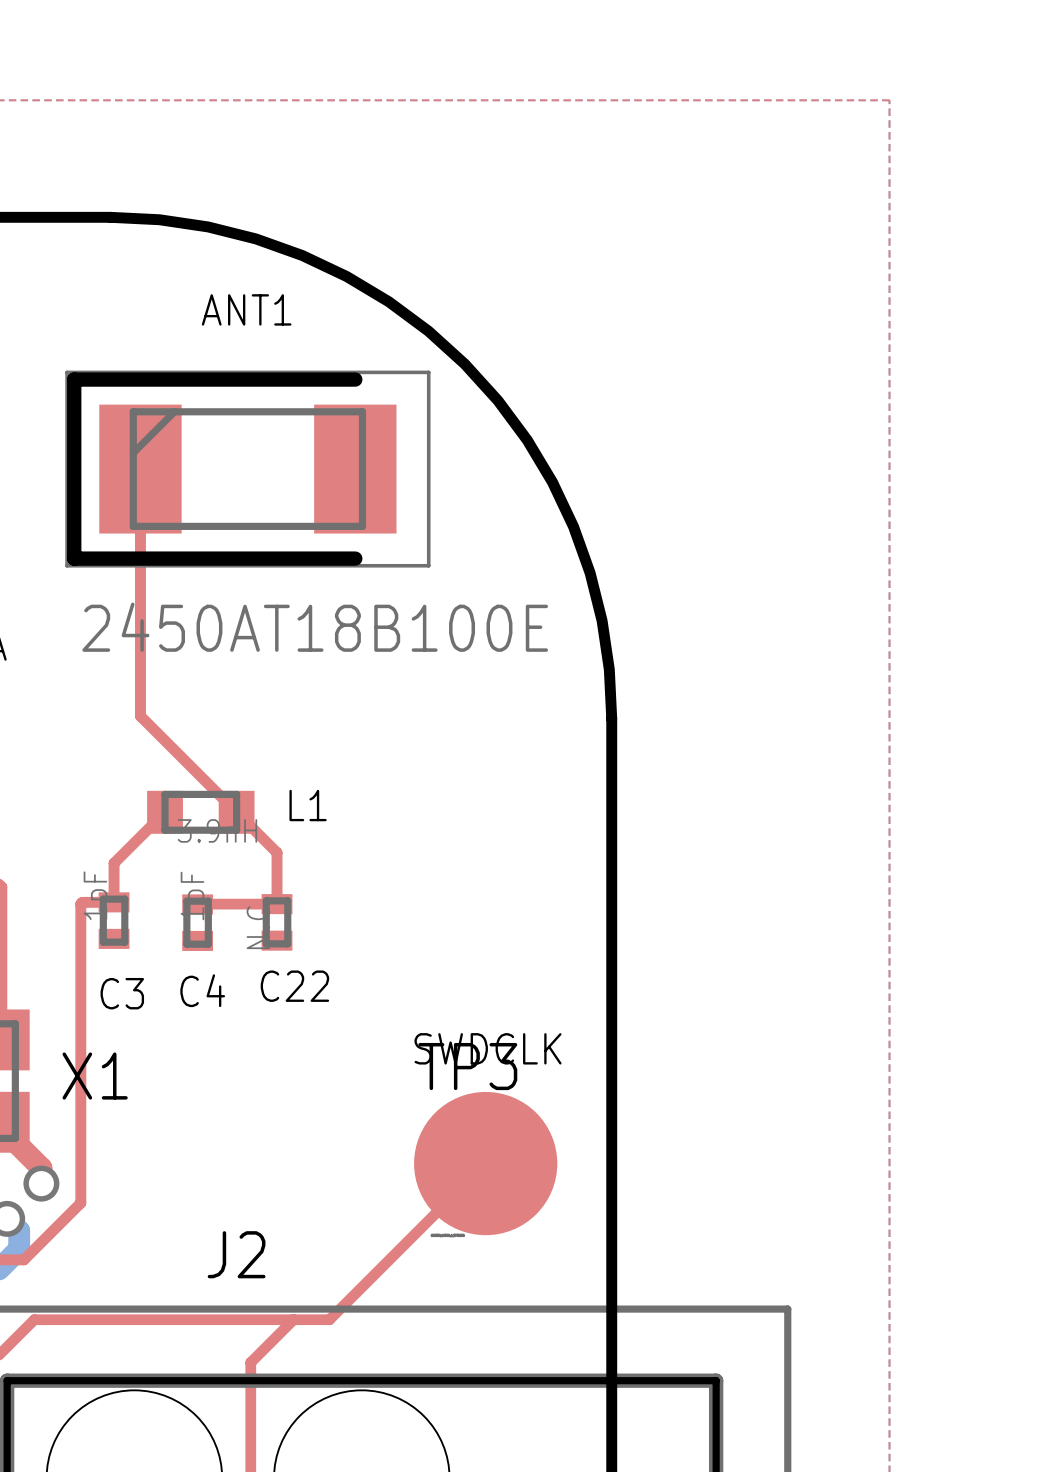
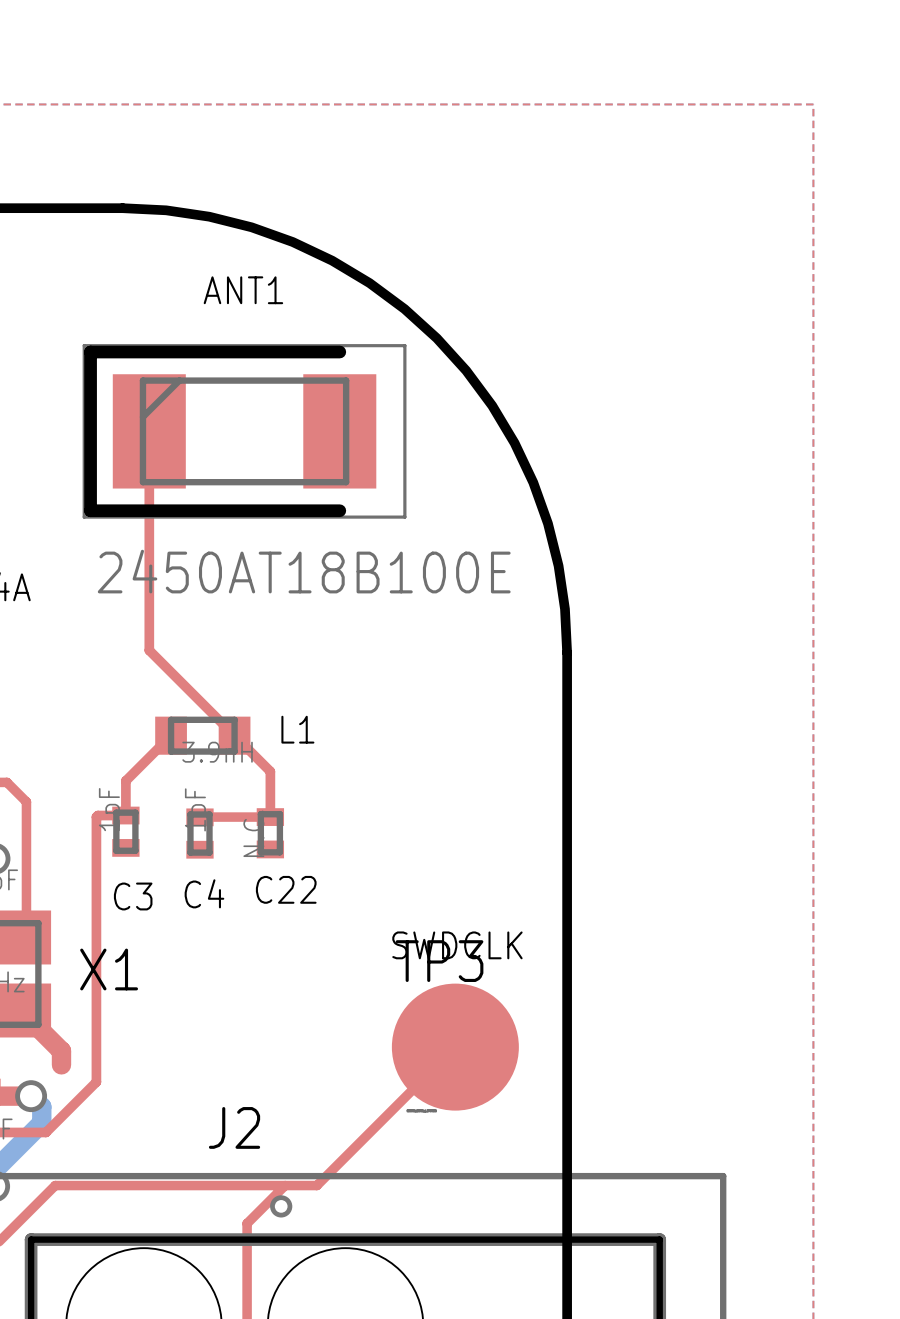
via: (41, 1183) -> none
via: none -> (281, 1206)

